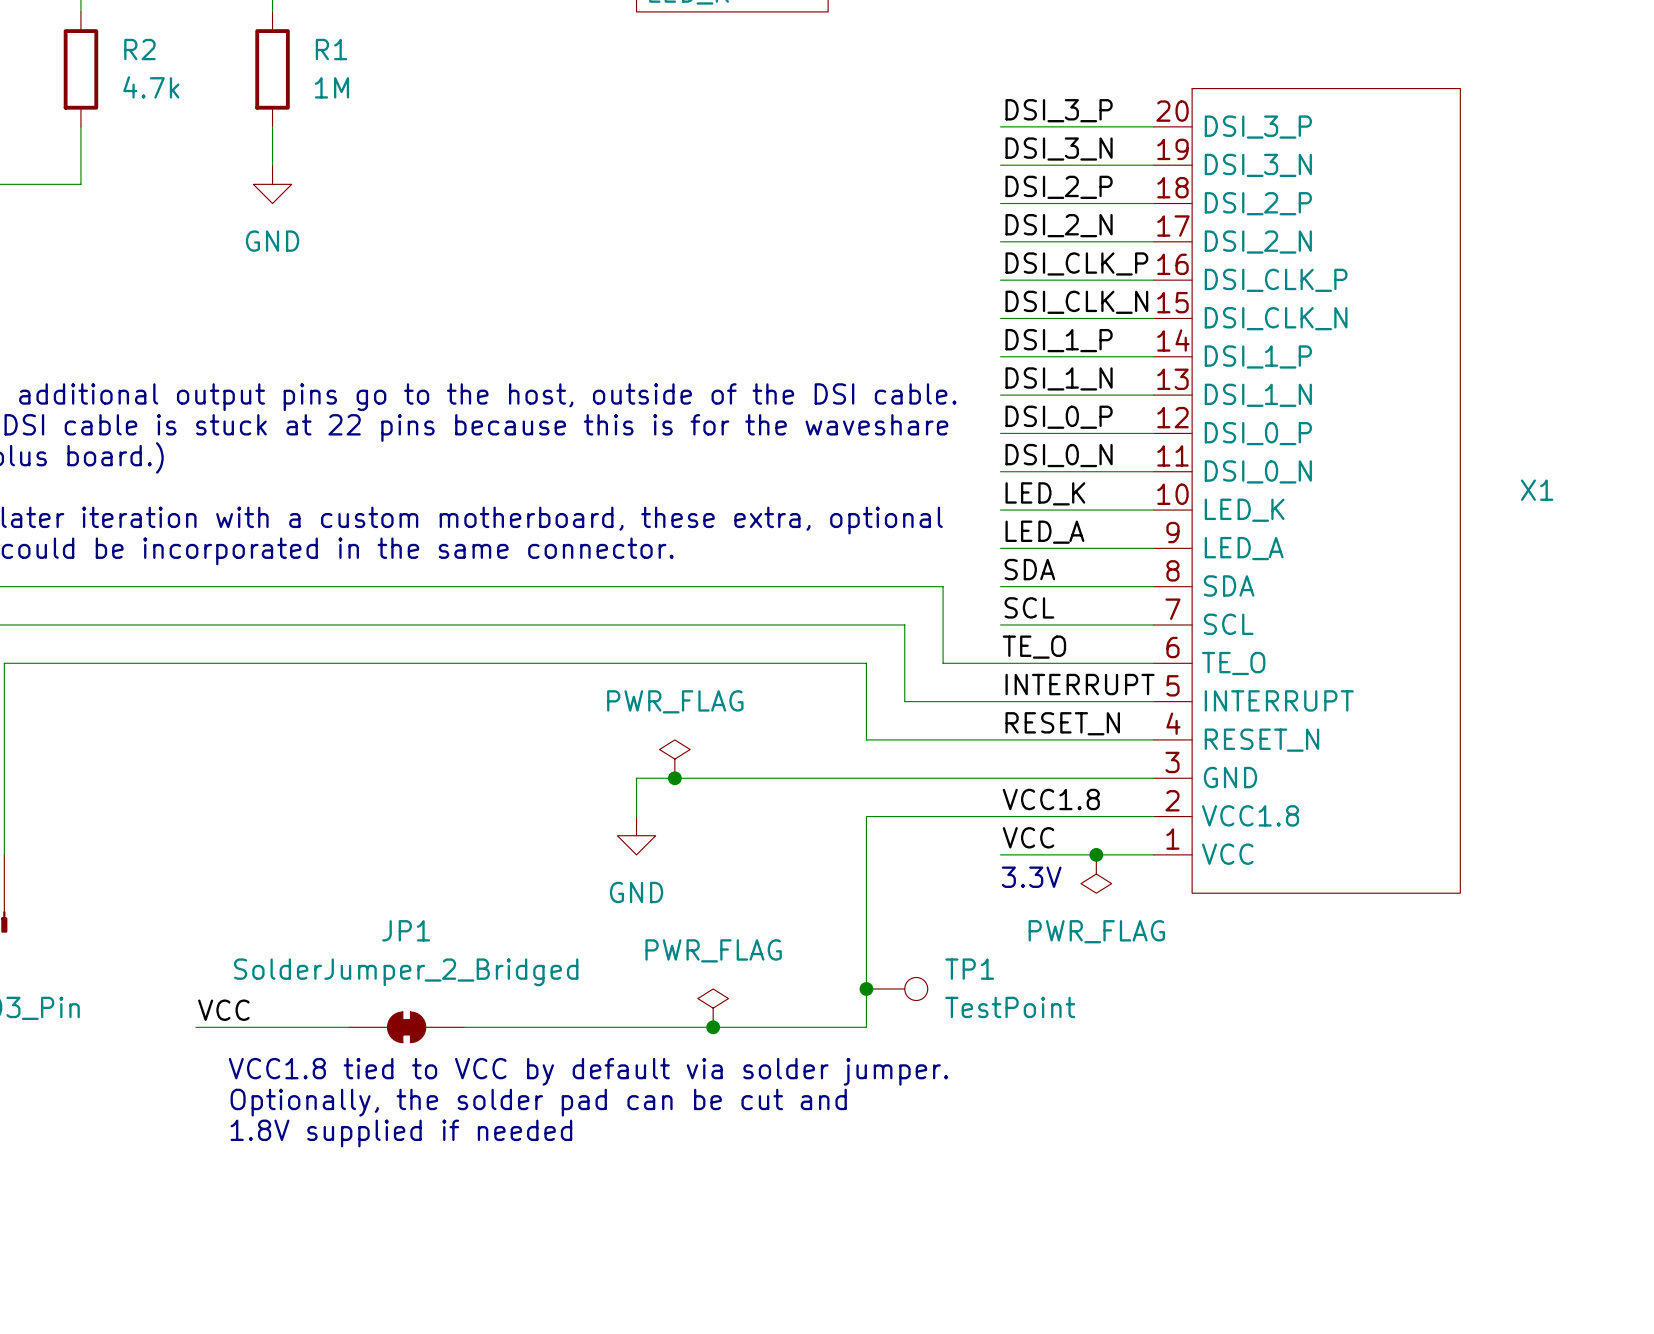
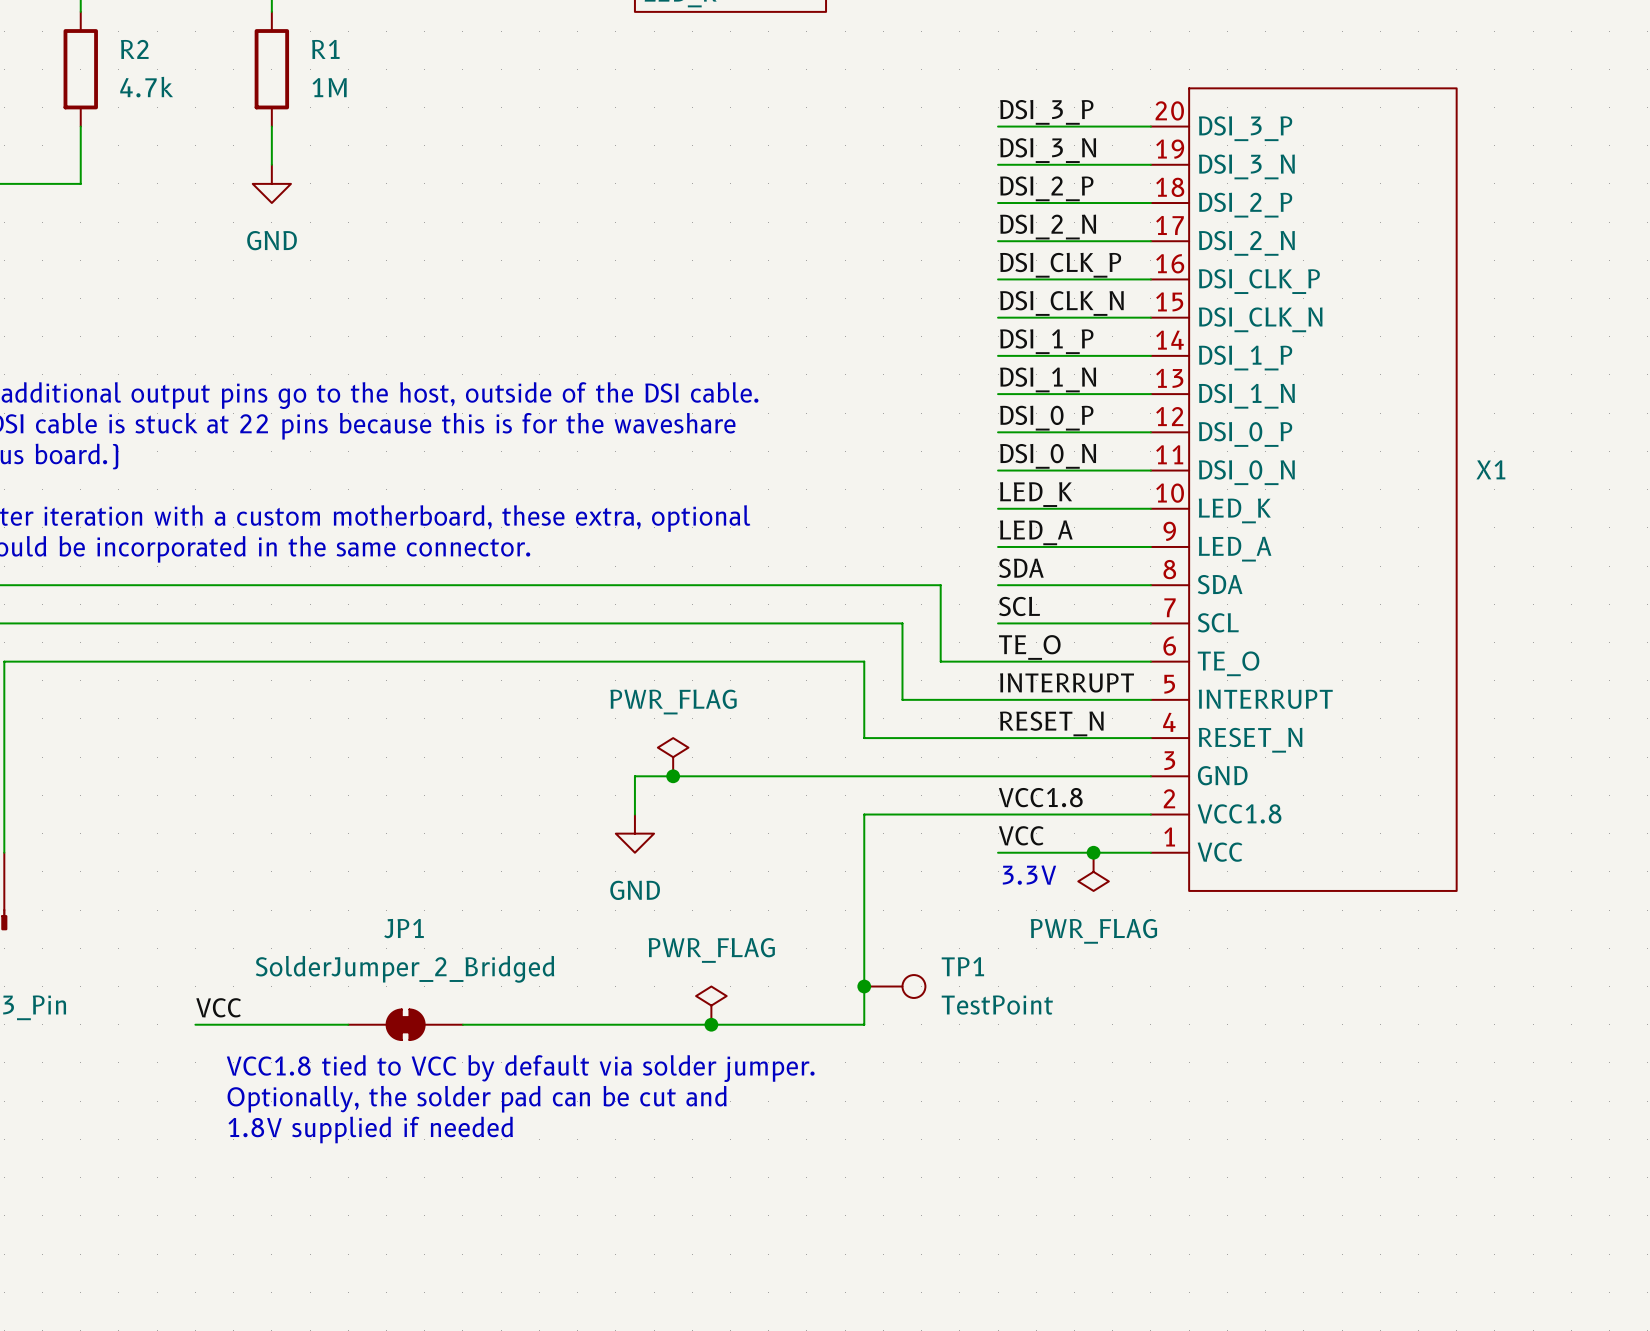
X1 name position: X1 (1537, 490) -> X1 (1490, 469)

